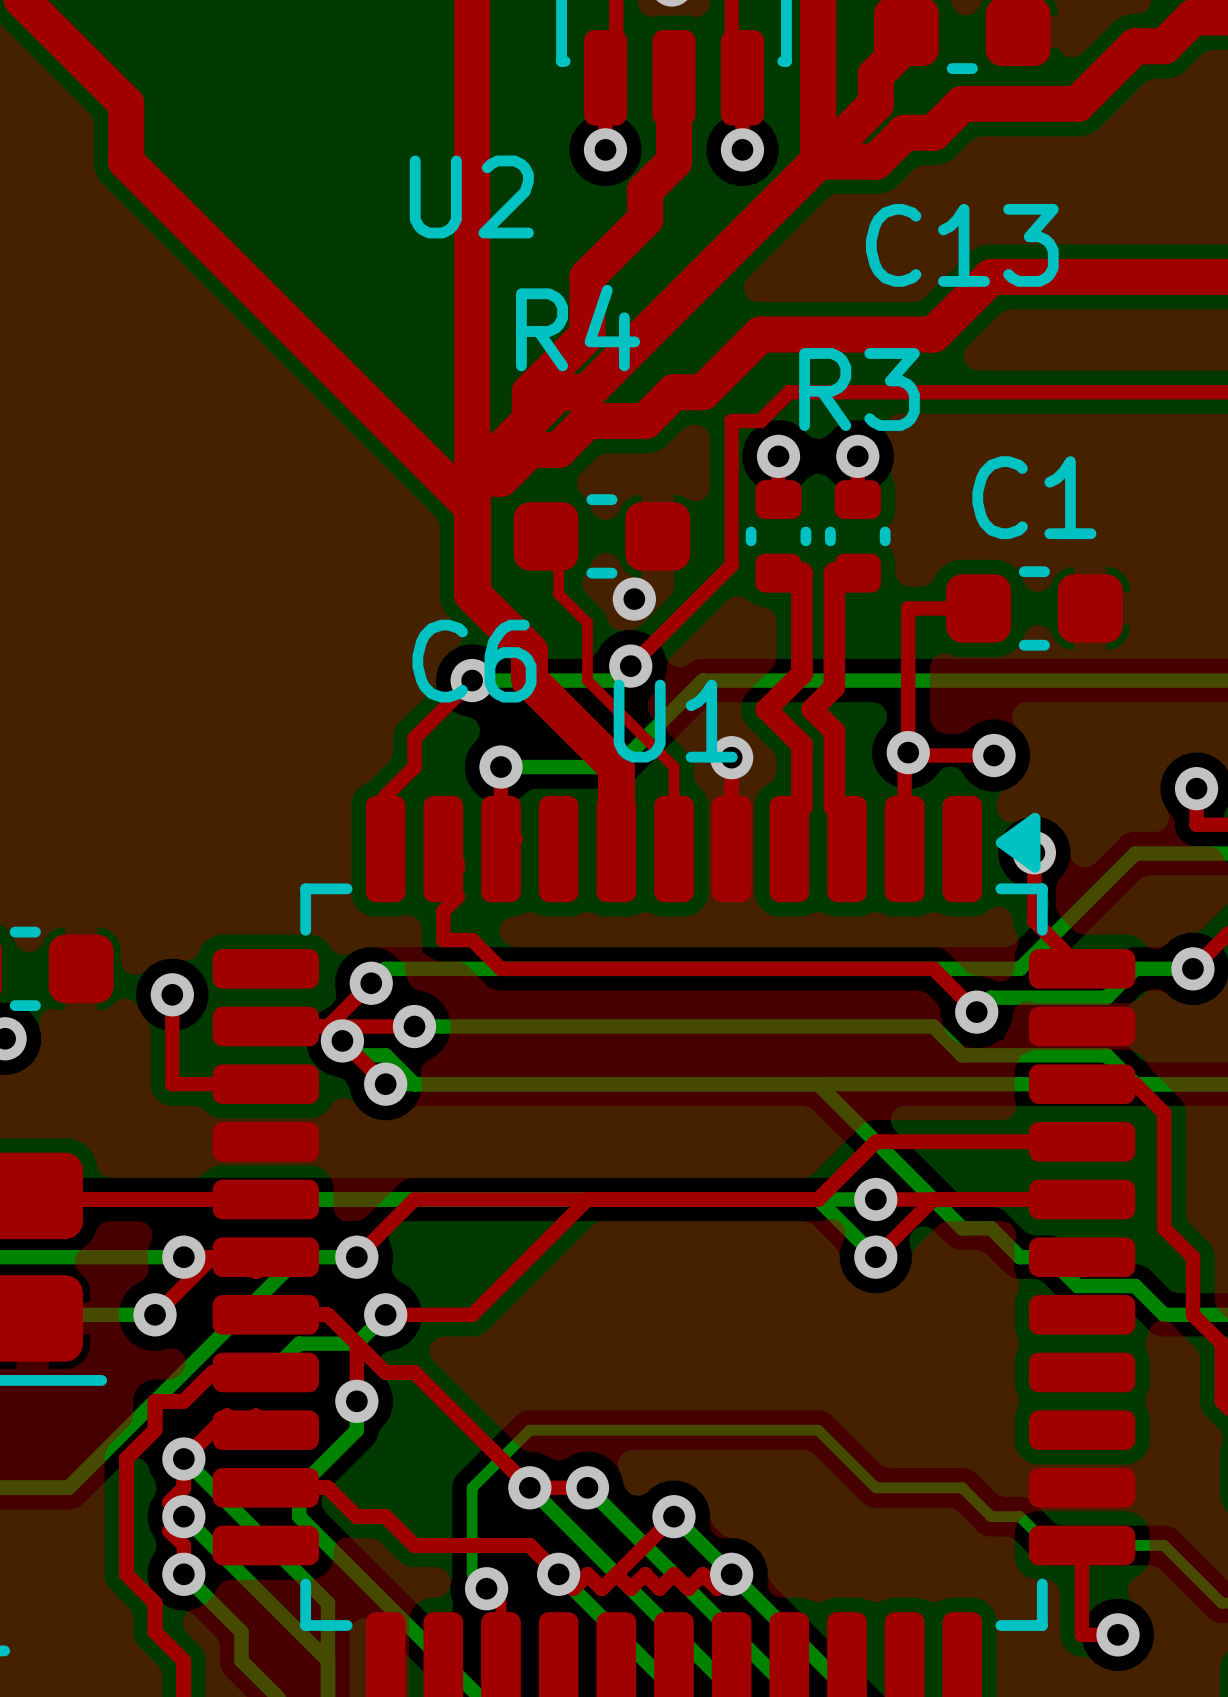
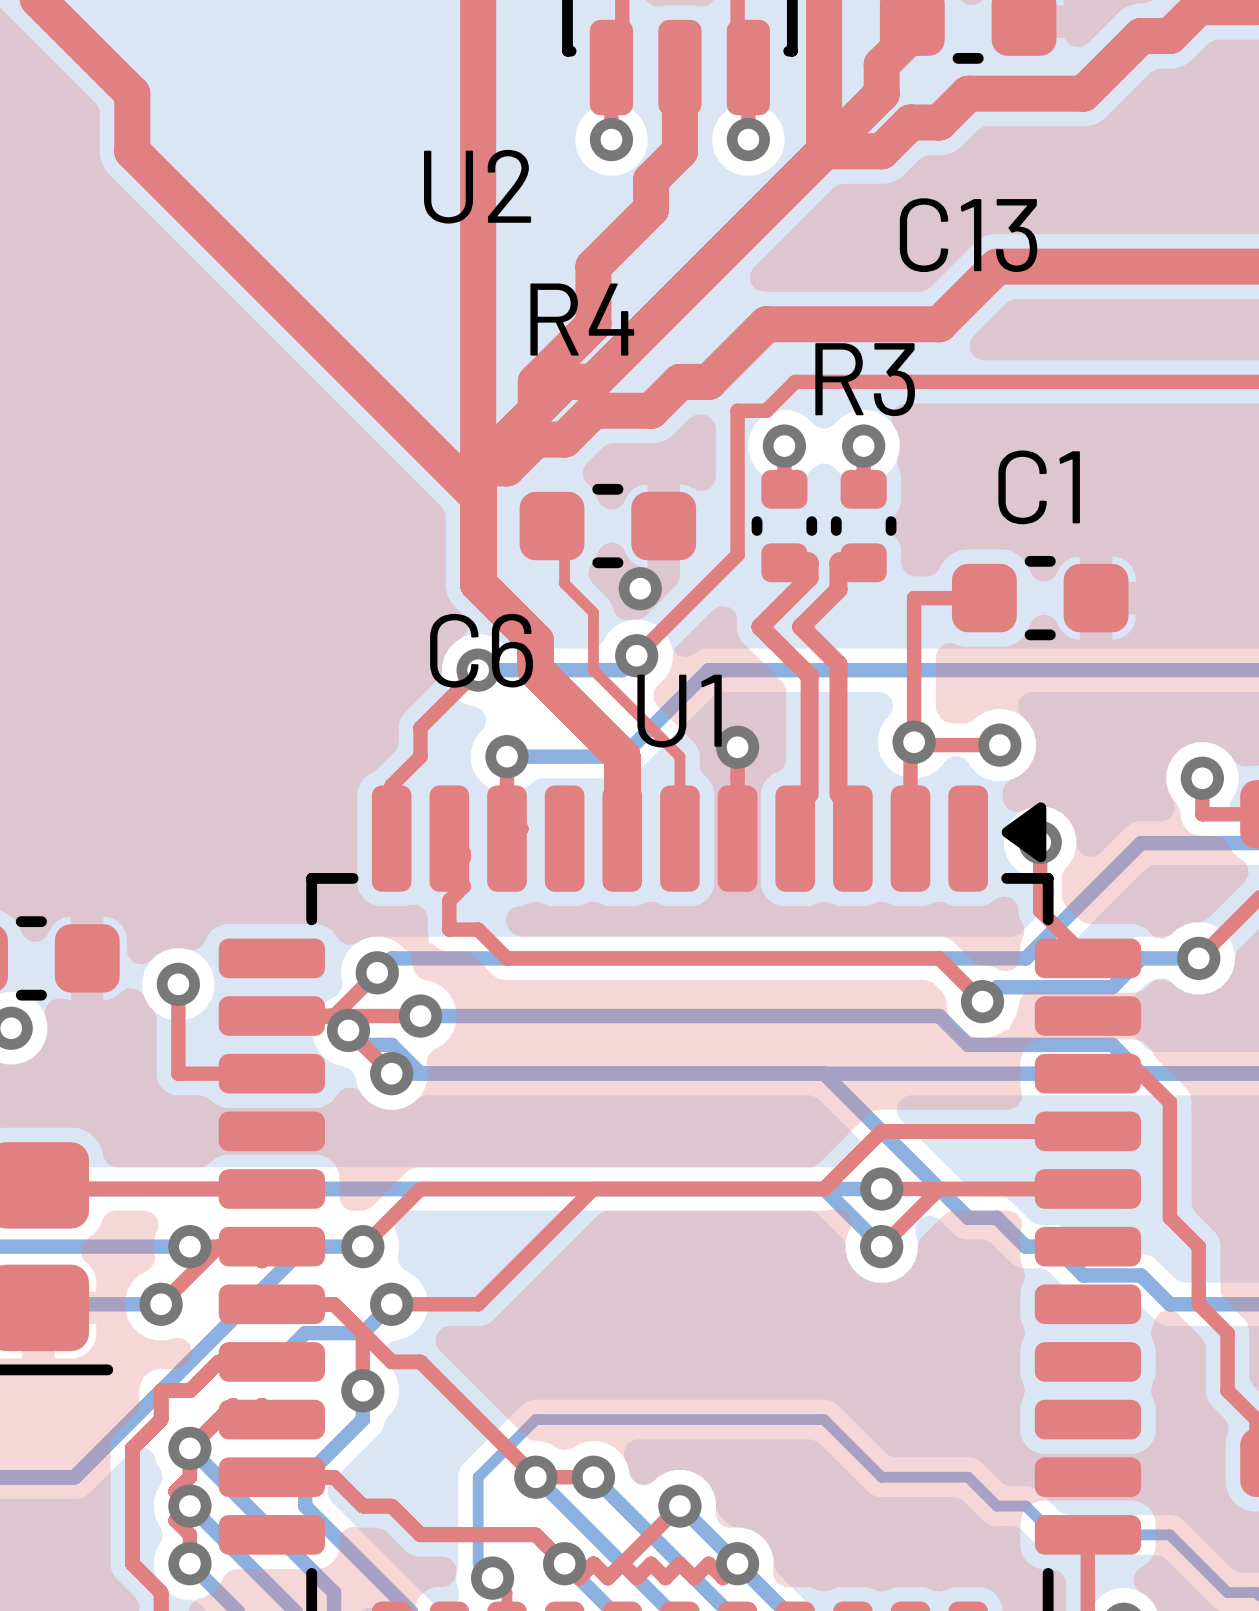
top track: (801, 573) (801, 673) (766, 709) (801, 744) (801, 806) -> (807, 562) (809, 562) (809, 577) (760, 626) (809, 676) (809, 794)
top track: (834, 573) (834, 687) (812, 709) (834, 731) (834, 806) -> (840, 562) (838, 562) (838, 589) (801, 626) (838, 664) (838, 794)

